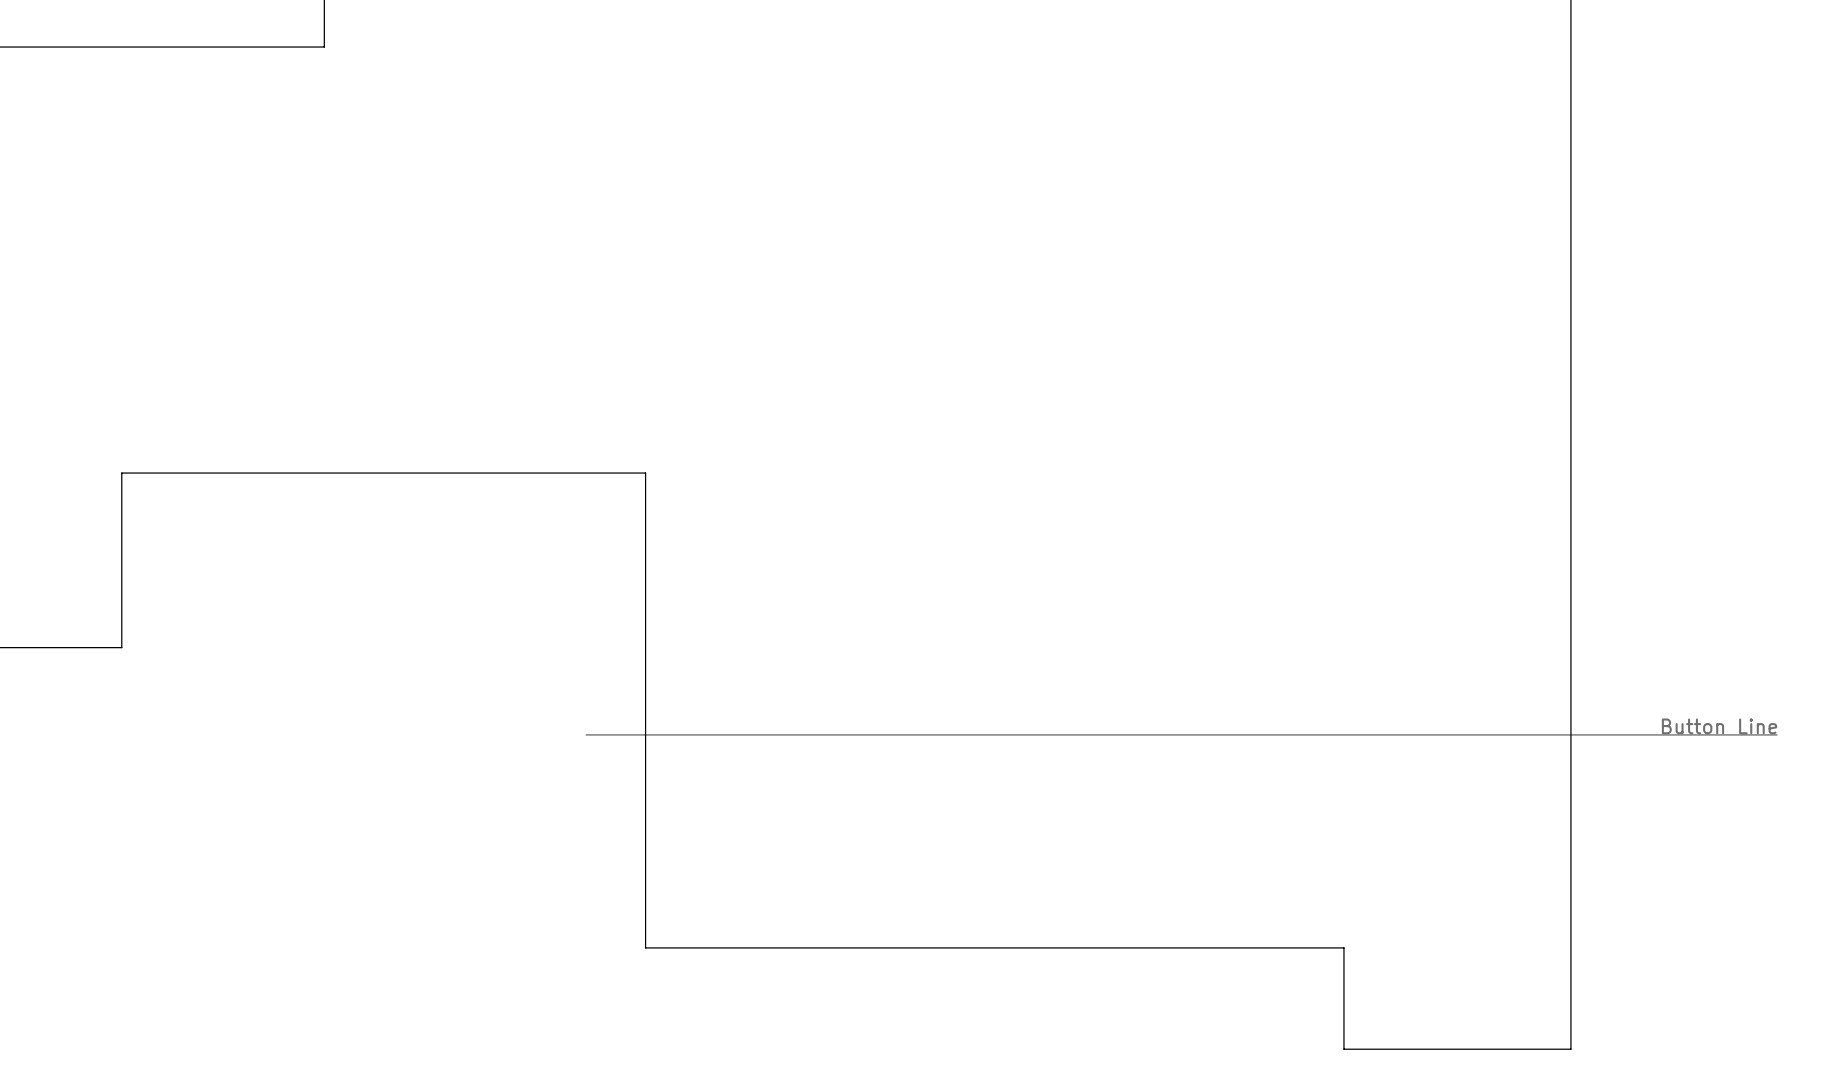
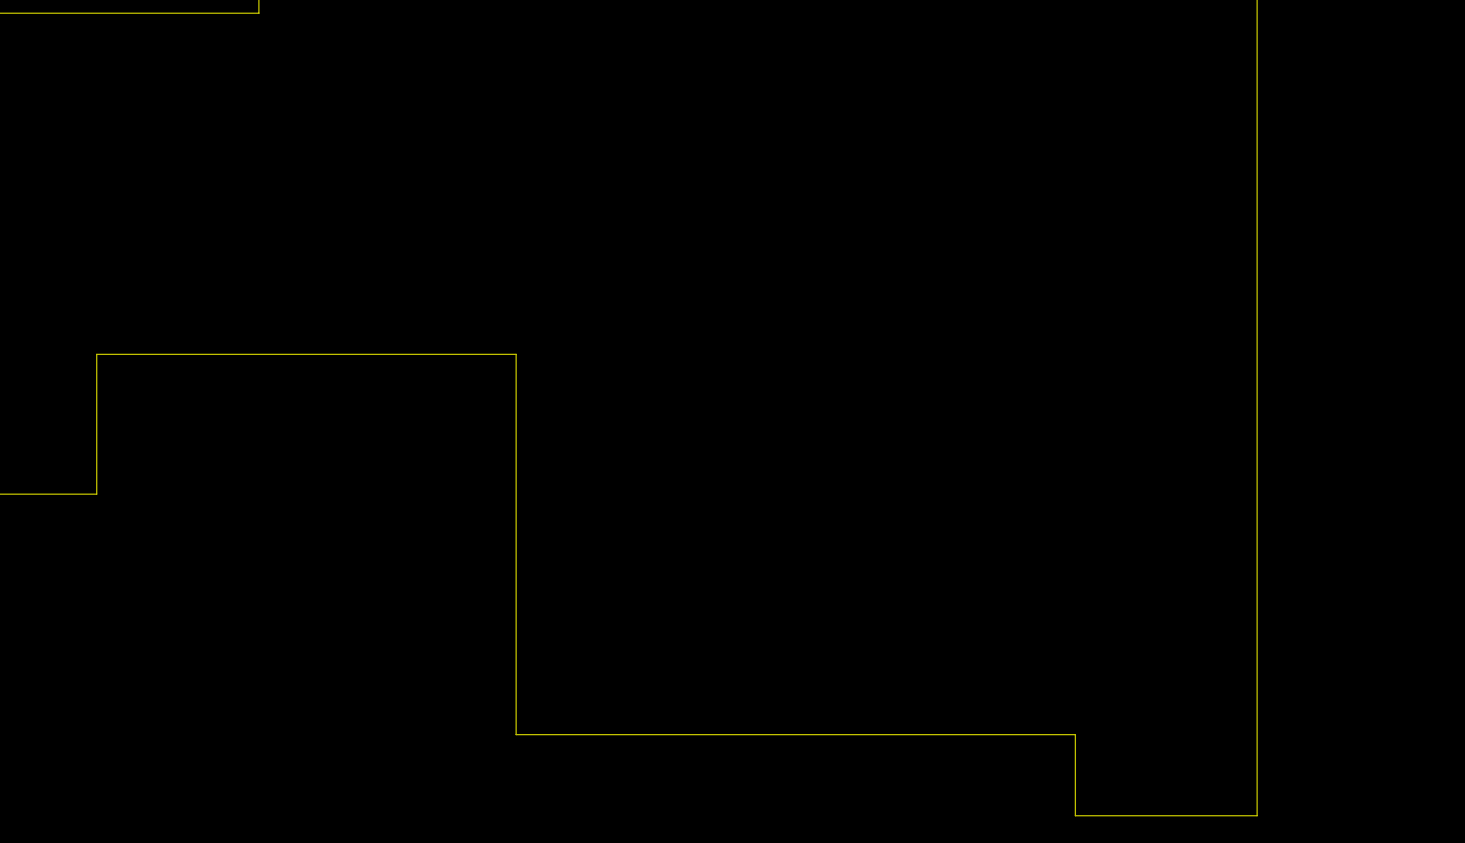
text: Button Line (1719, 726) -> none
line: (1776, 734) (586, 734) -> none

